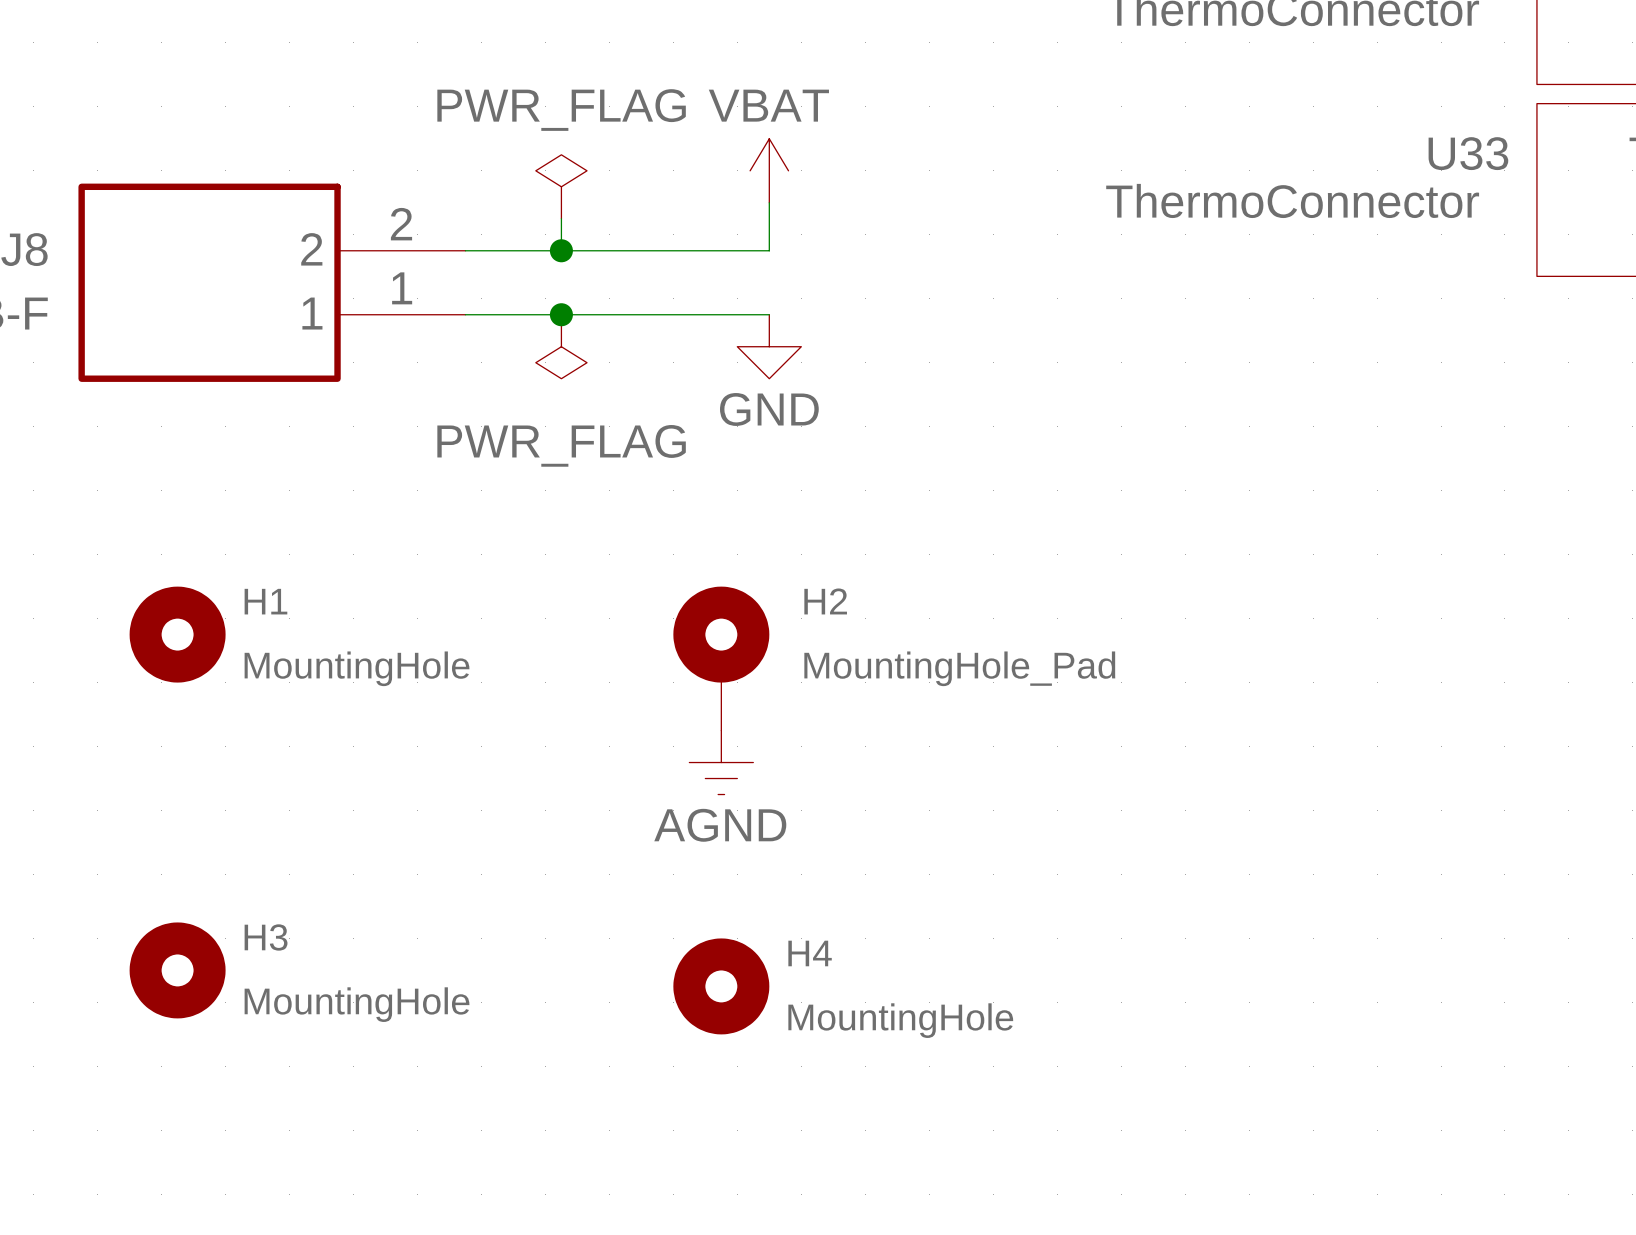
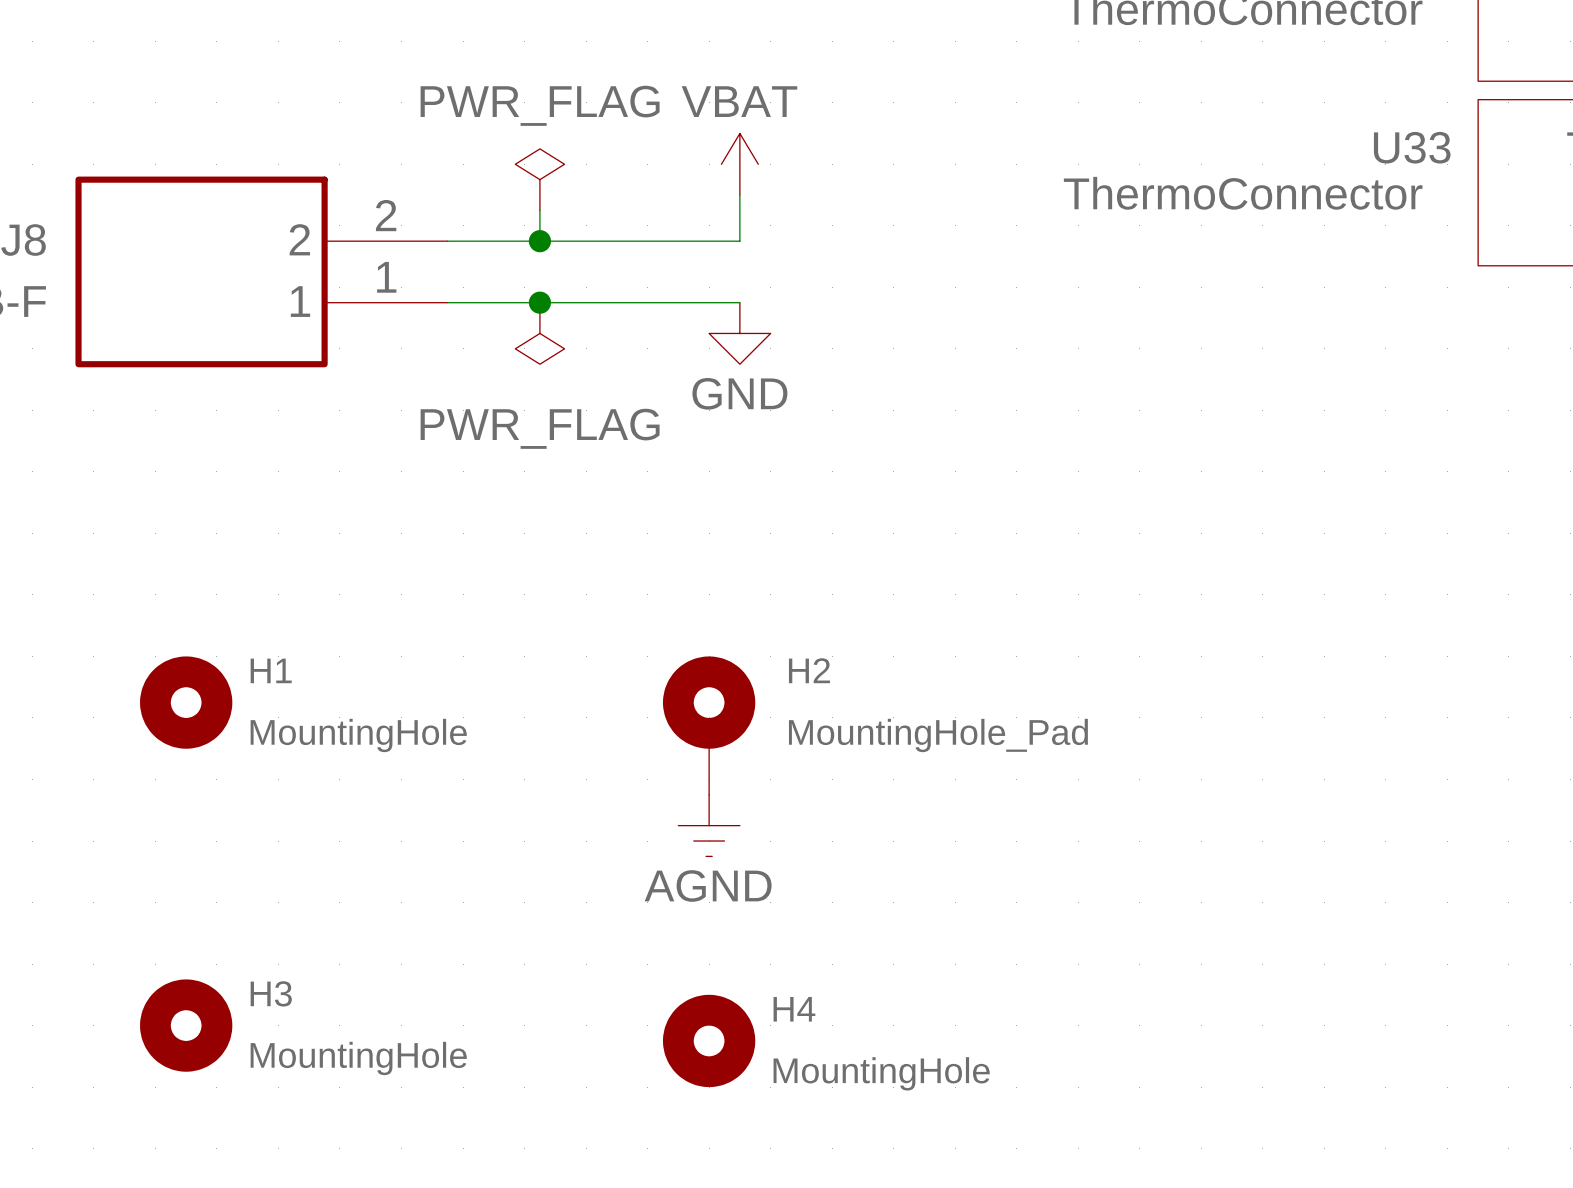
H1 position: (177, 634) -> (186, 702)
H2 position: (721, 658) -> (709, 725)
power symbol position: AGND (721, 762) -> AGND (709, 825)
H3 position: (177, 970) -> (186, 1025)
H4 position: (721, 986) -> (709, 1040)

